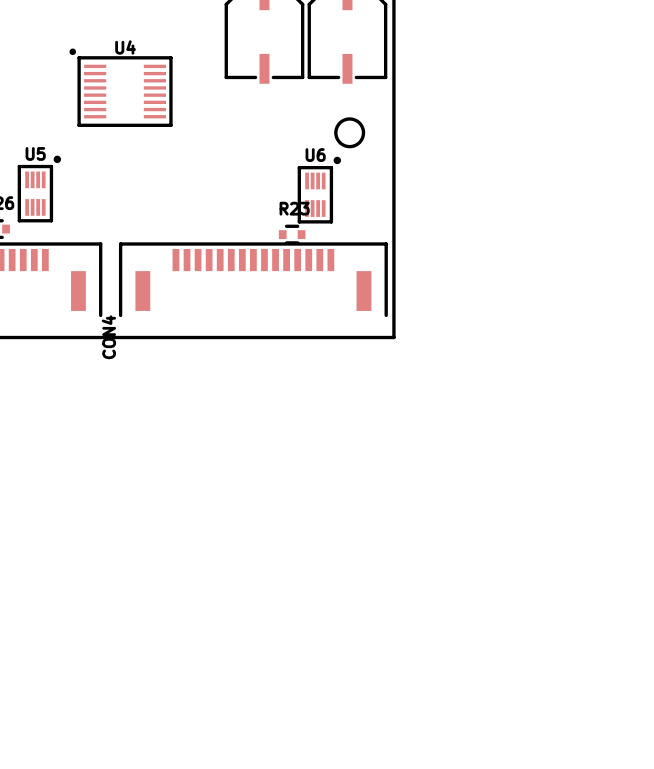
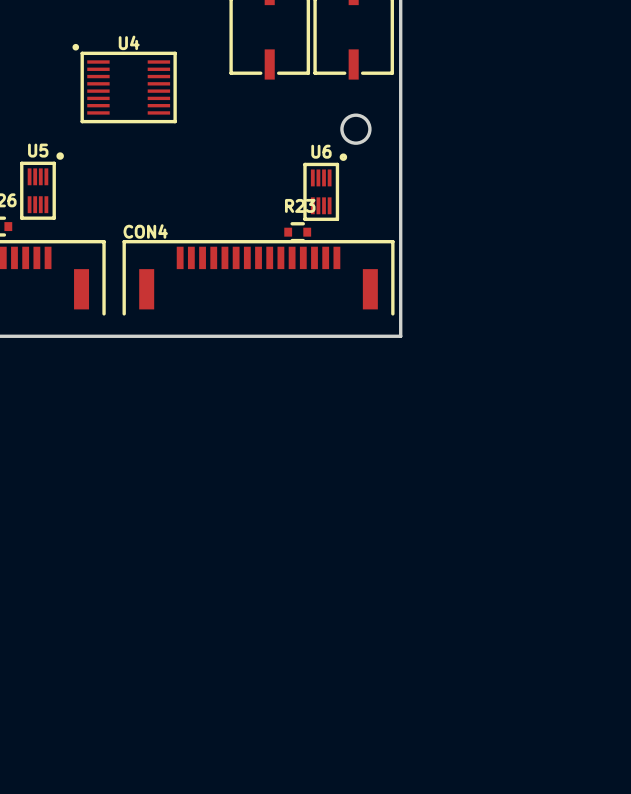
CON4 name rotation: 0° (108, 337) -> 90° clockwise (145, 231)
CON4 name position: CON4 (108, 337) -> CON4 (145, 231)

